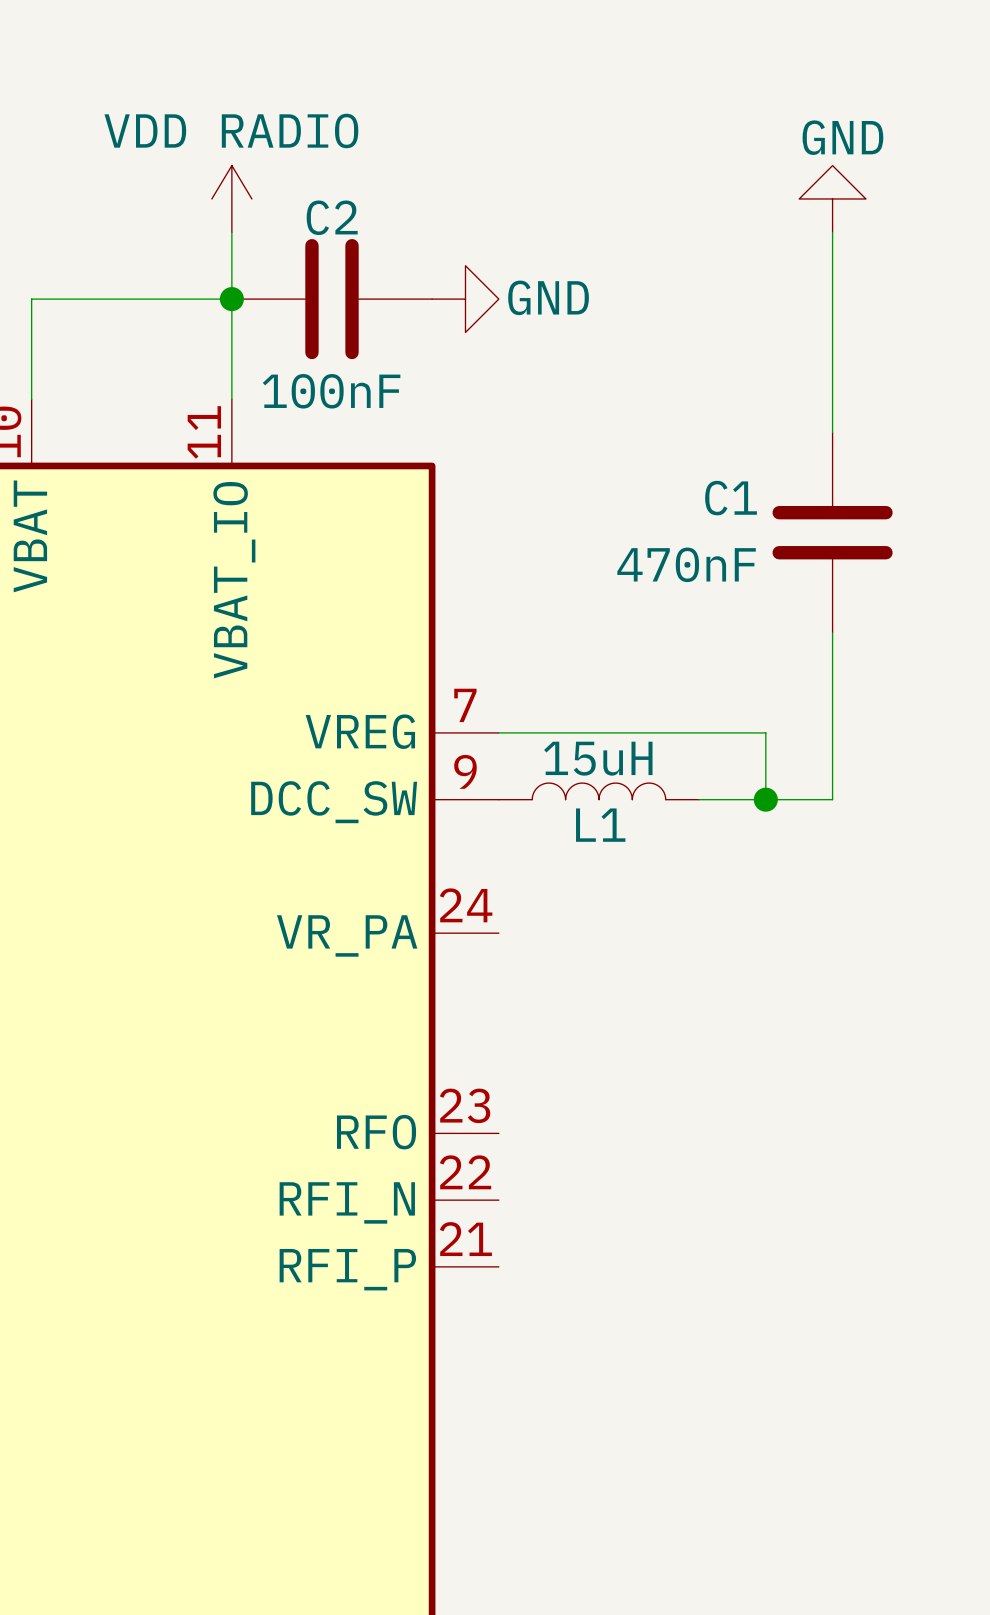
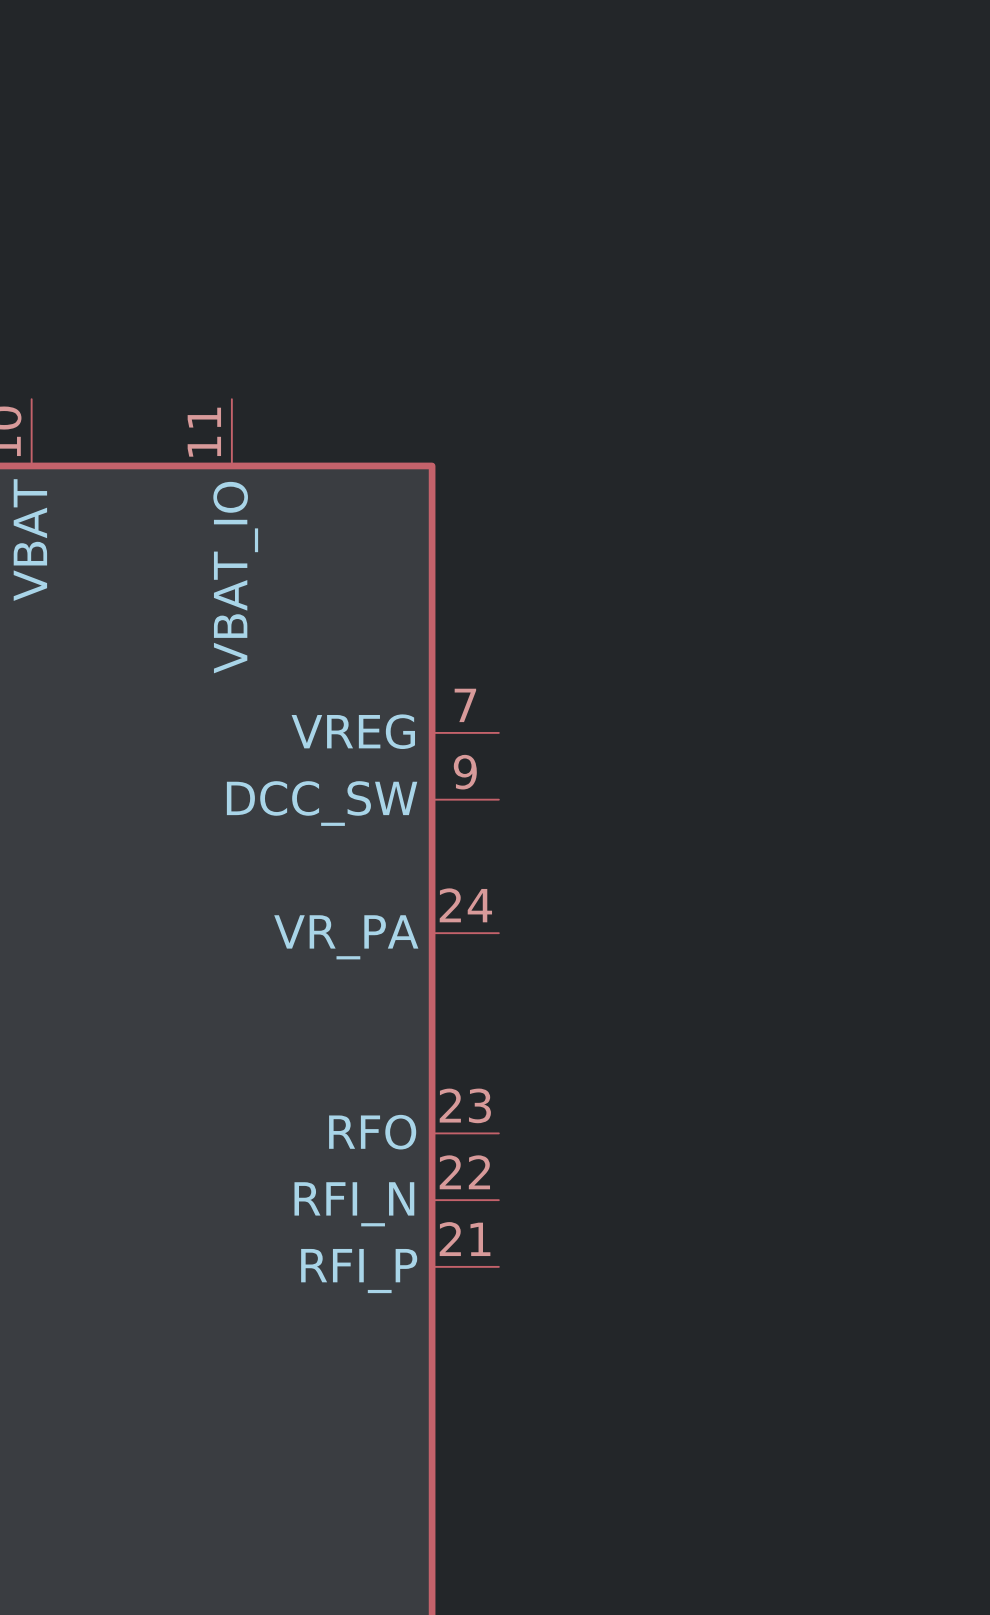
power symbol: VDD RADIO (231, 198) -> none
power symbol: GND (832, 198) -> none
wire: (231, 232) (231, 399) -> none
wire: (832, 232) (832, 432) -> none
wire: (231, 299) (31, 299) (31, 399) -> none
junction: (231, 299) -> none
C2: 100nF (331, 299) -> none
power symbol: GND (465, 299) -> none
C1: 470nF (832, 532) -> none
wire: (832, 632) (832, 799) (699, 799) -> none
wire: (498, 732) (765, 732) (765, 799) -> none
L1: 15uH (598, 791) -> none
junction: (765, 799) -> none

